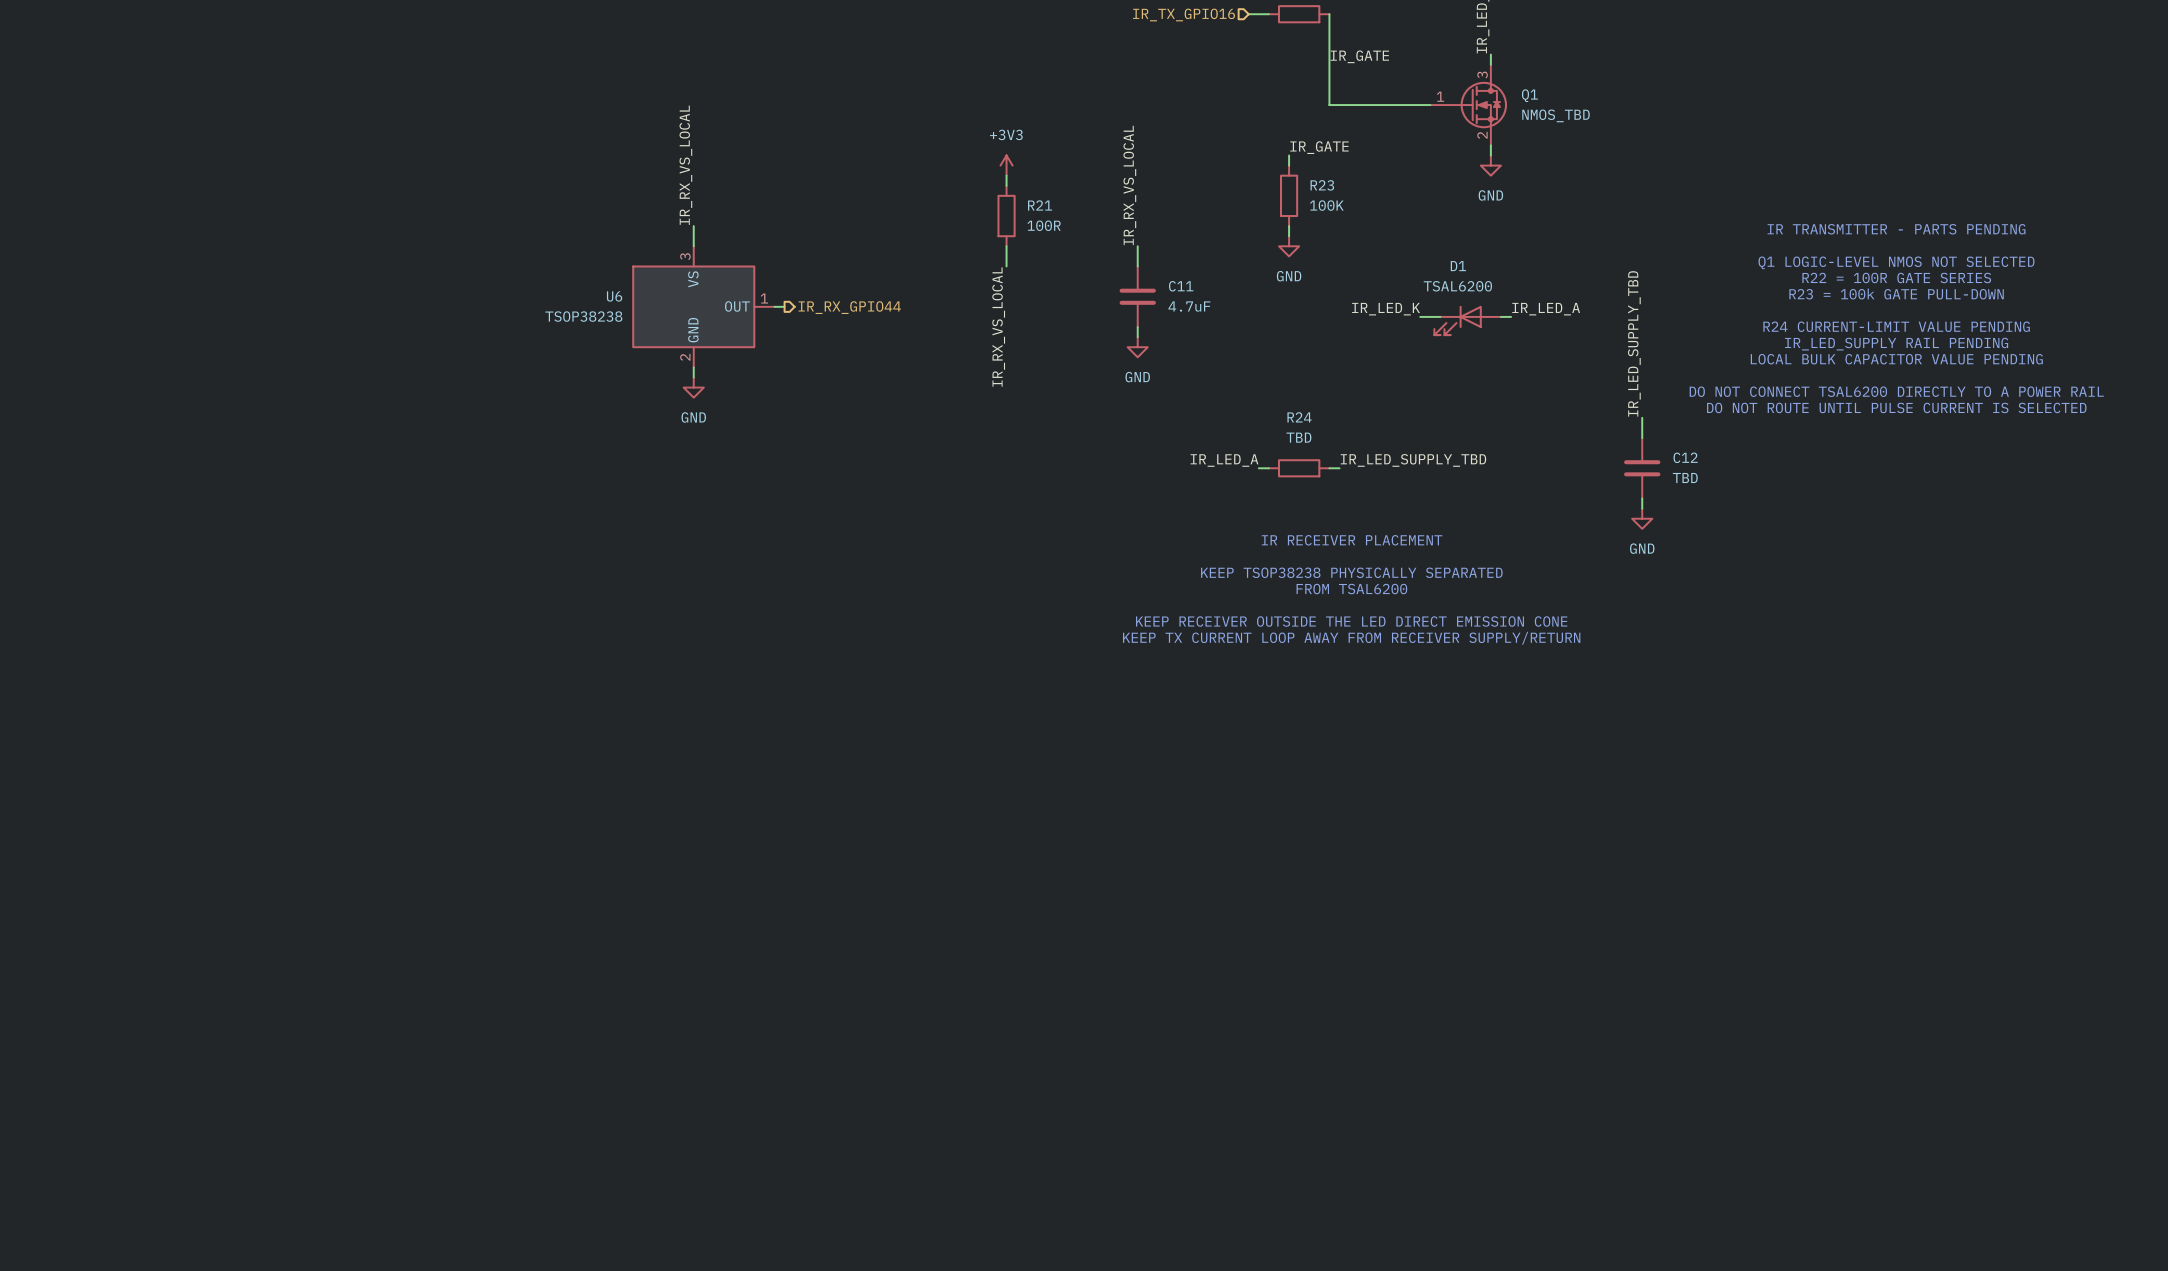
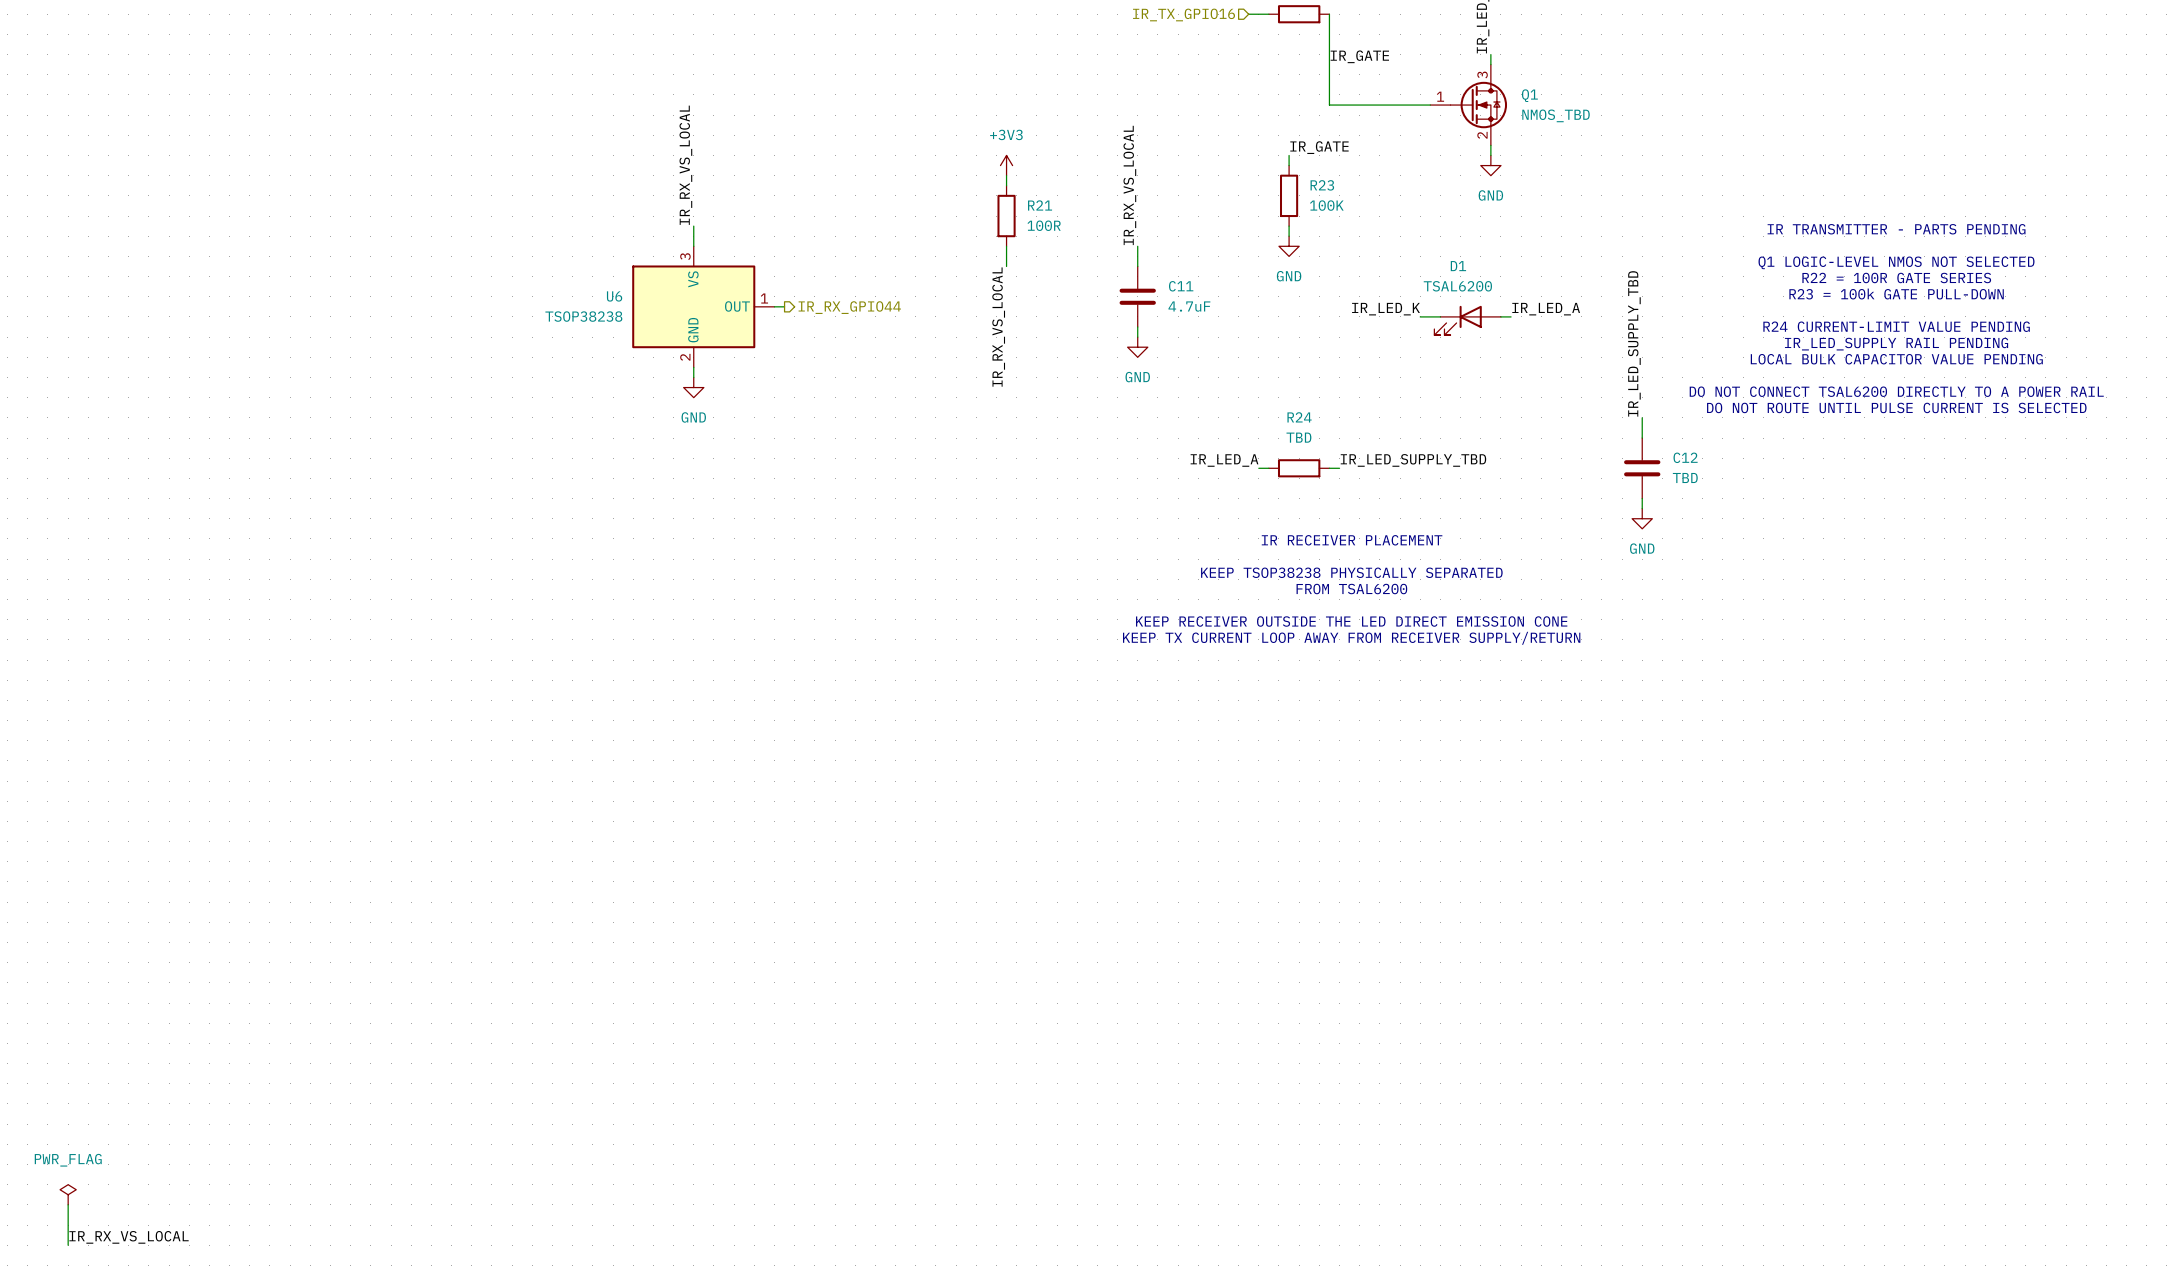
power symbol: none -> PWR_FLAG (68, 1194)
wire: none -> (68, 1204) (68, 1245)
label: none -> IR_RX_VS_LOCAL (129, 1237)

